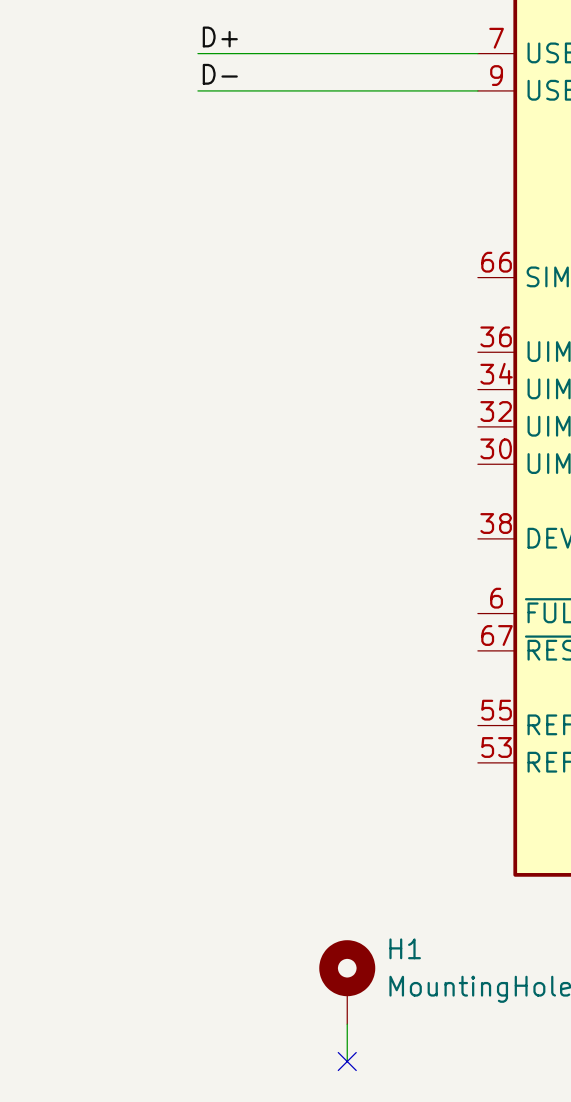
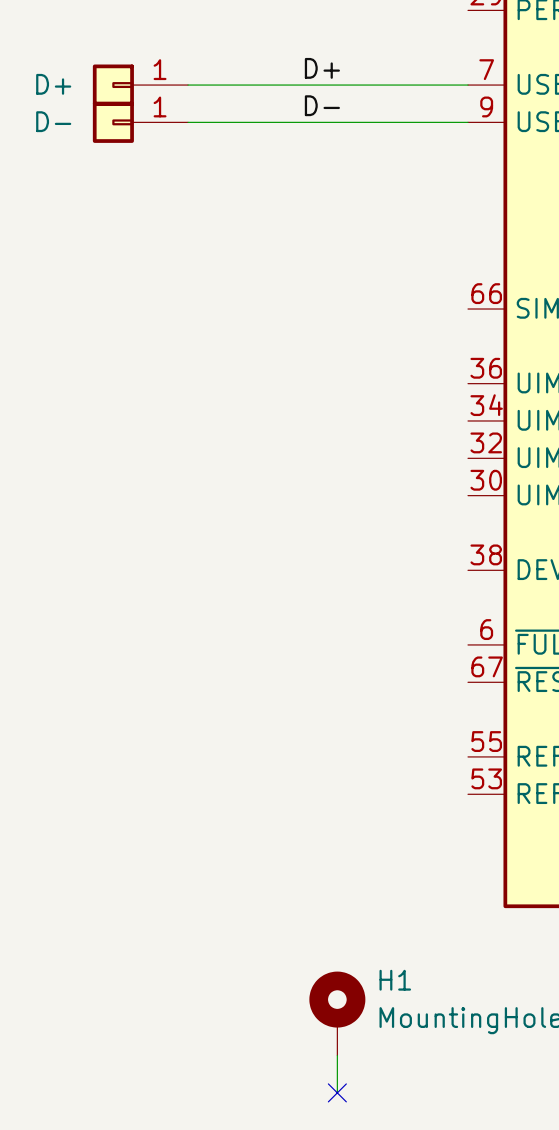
label position: D+ (220, 36) -> D+ (322, 68)
part: none -> D+ (140, 85)
label position: D- (220, 74) -> D- (322, 105)
part: none -> D- (140, 122)

